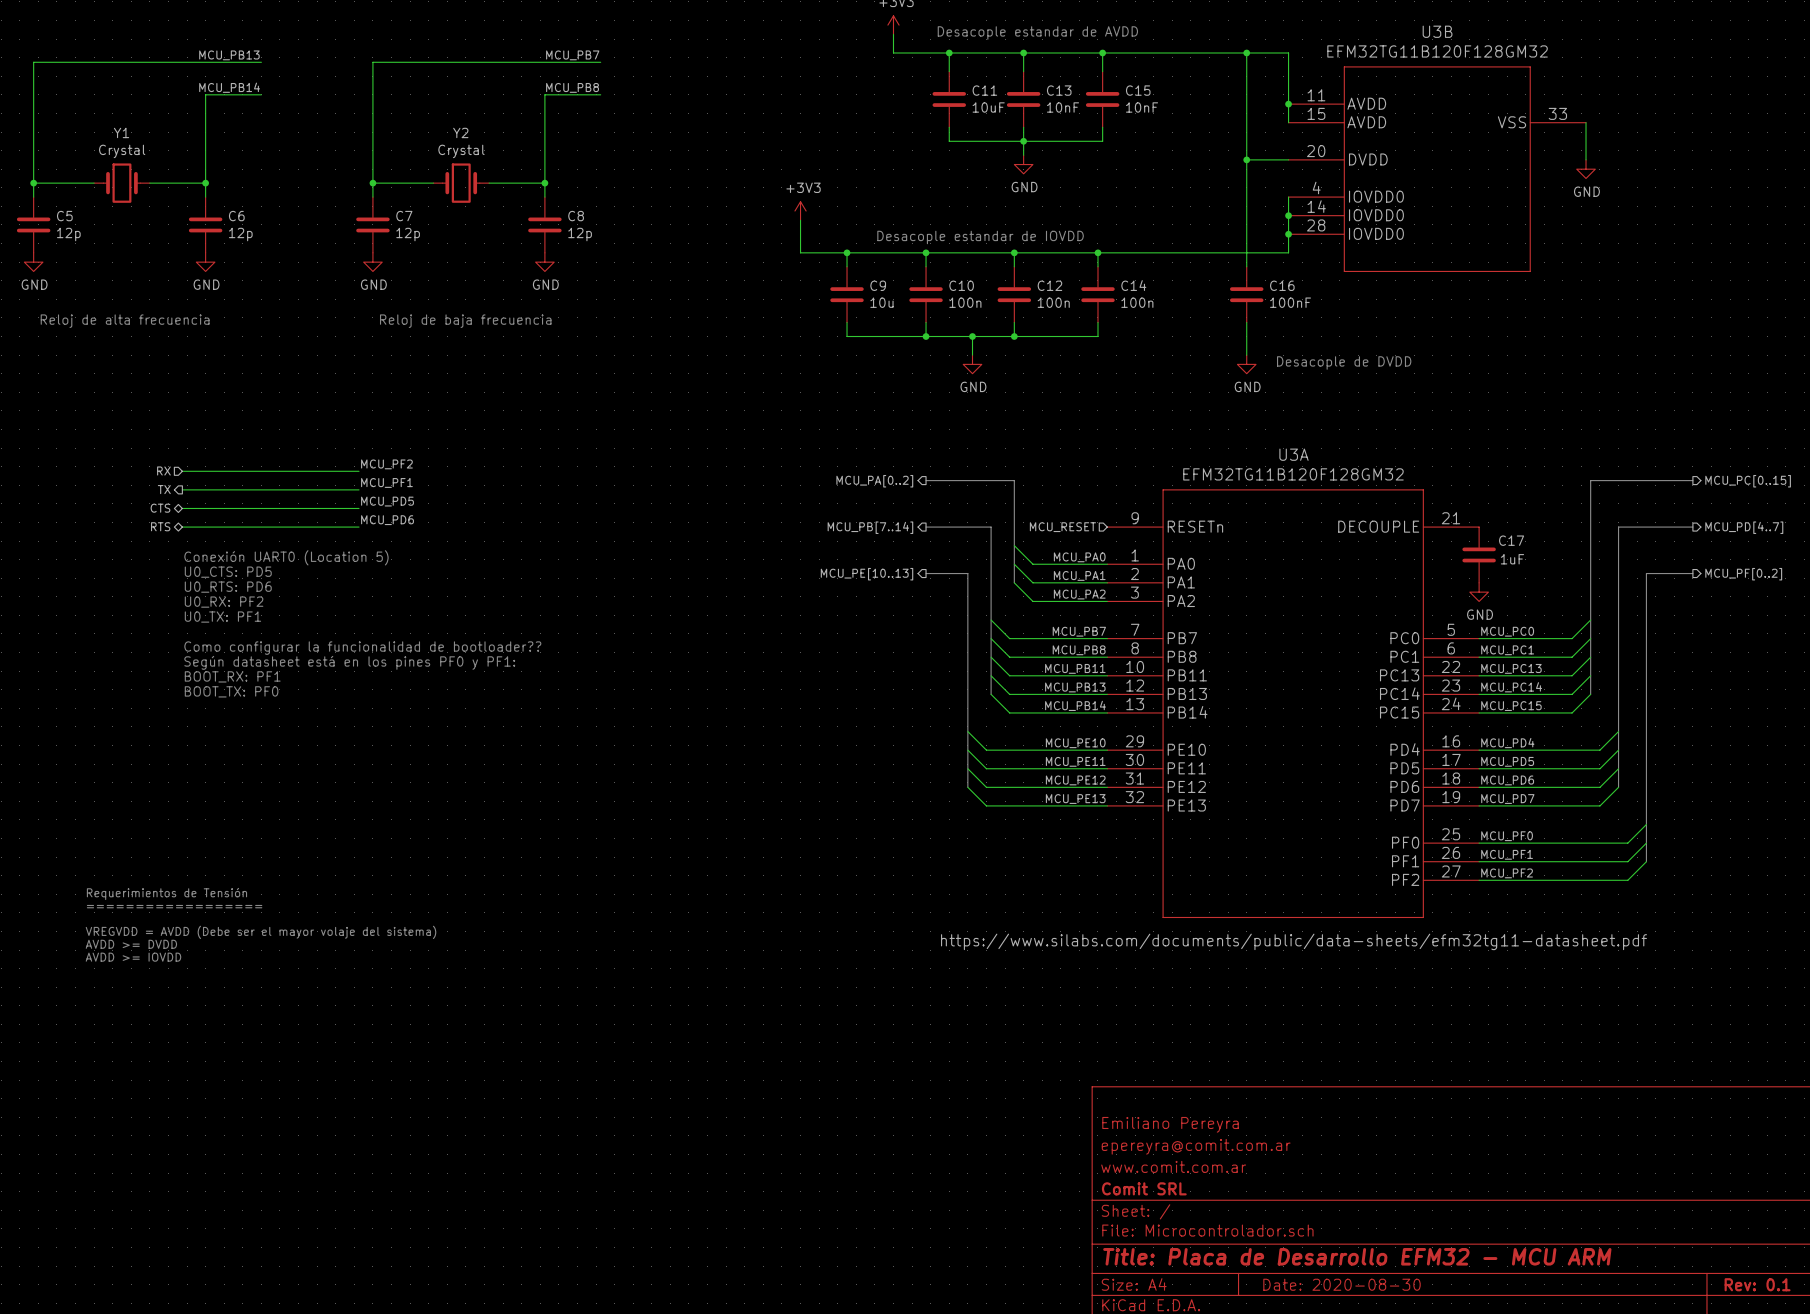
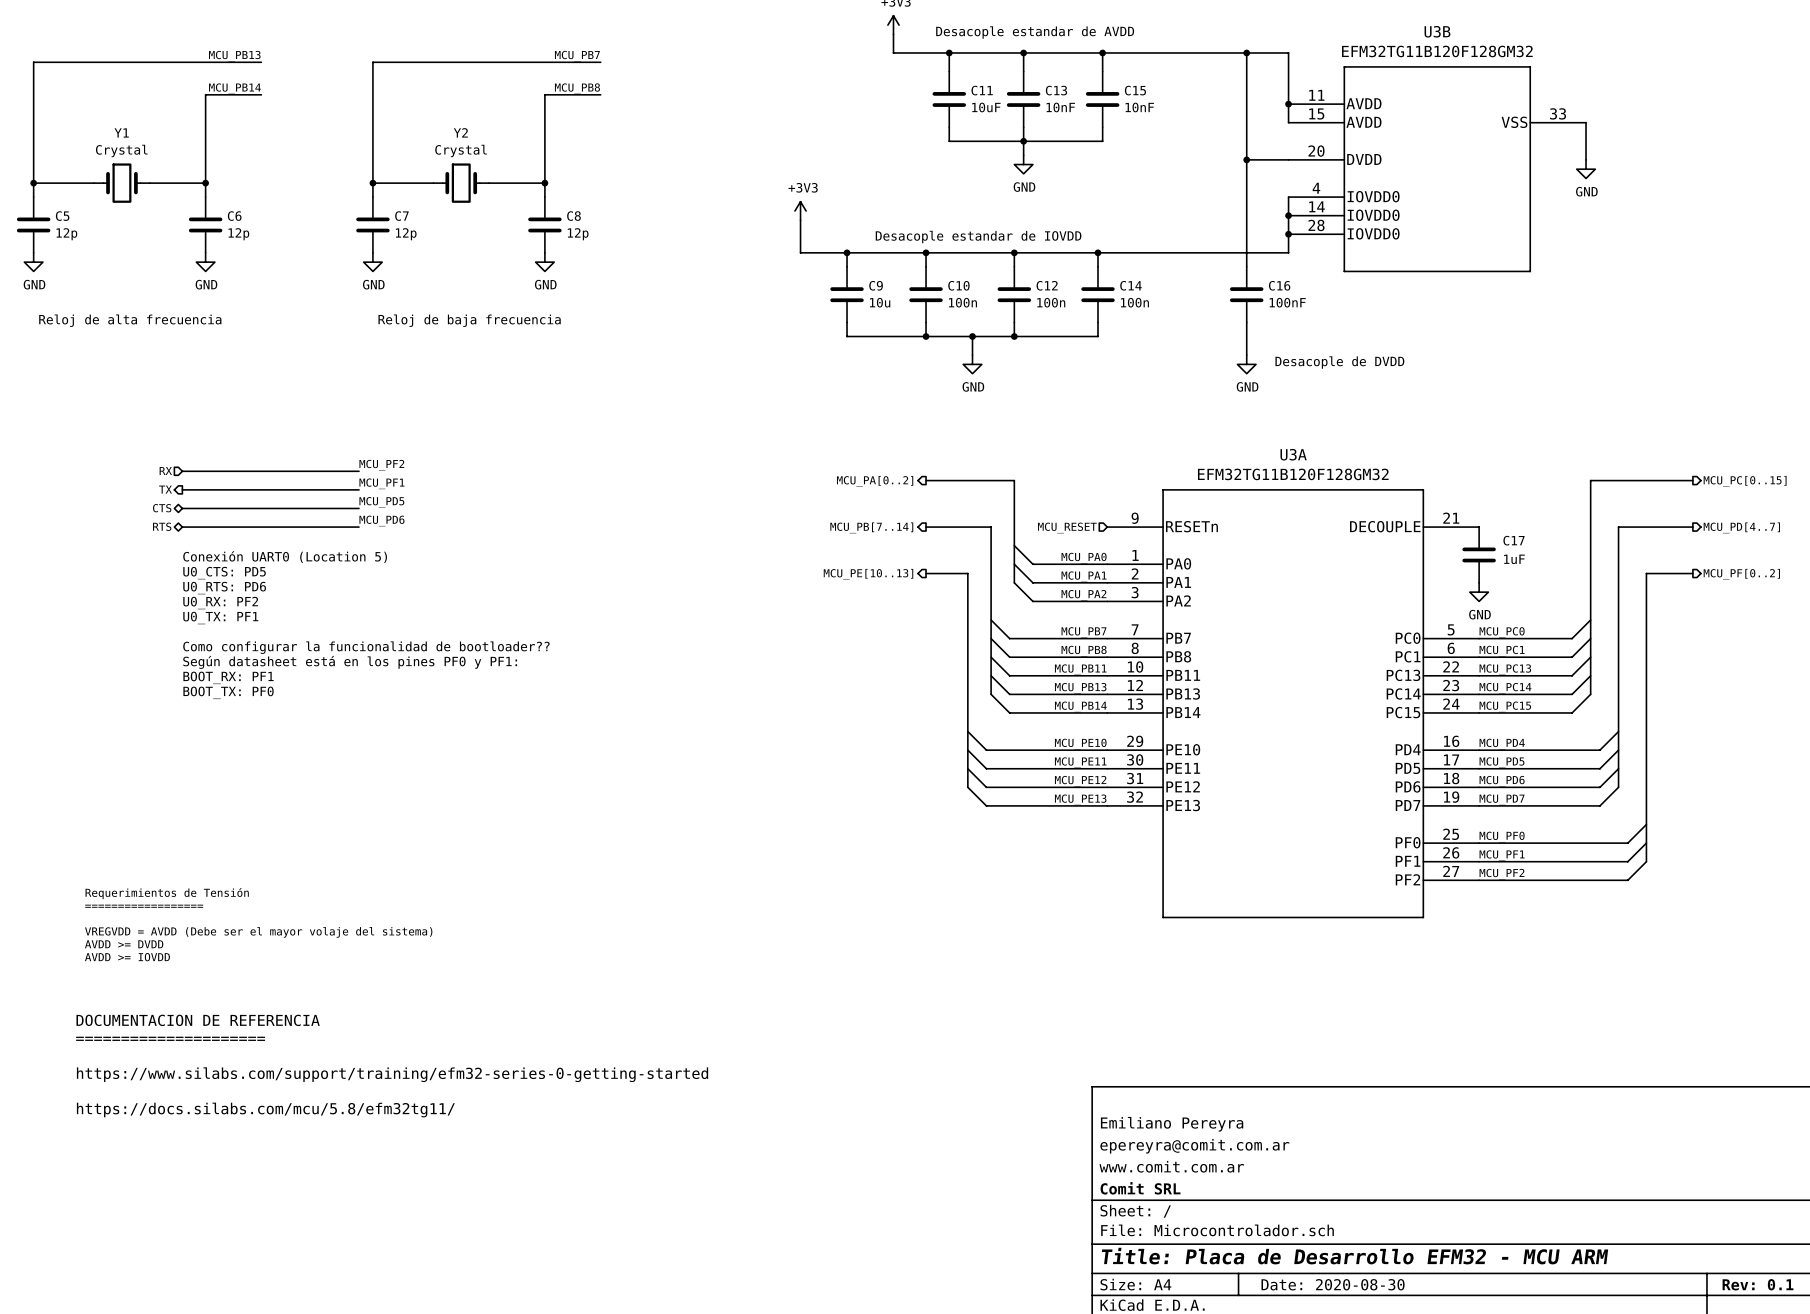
U3A text: https://www.silabs.com/documents/public/data-sheets/efm32tg11-datasheet.pdf (1294, 941) -> none
text: none -> DOCUMENTACION DE REFERENCIA (198, 1020)
text: none -> ===================== (170, 1038)
text: none -> https://www.silabs.com/support/training/efm32-series-0-getting-started (392, 1074)
text: none -> https://docs.silabs.com/mcu/5.8/efm32tg11/ (265, 1110)

